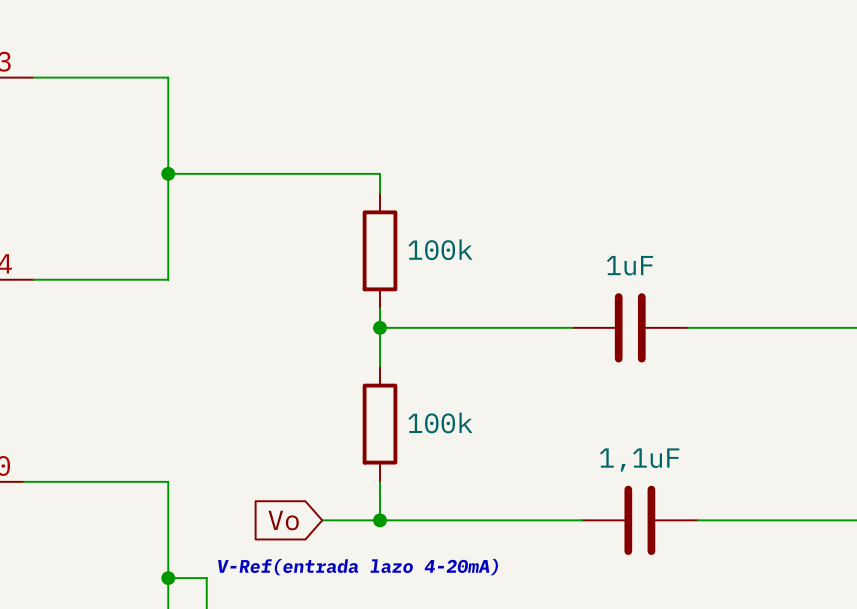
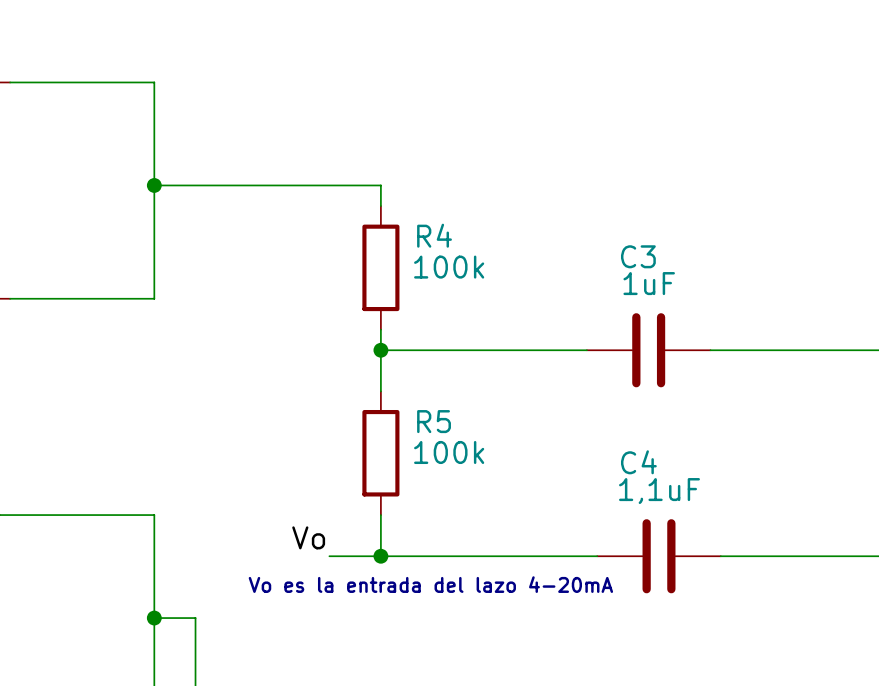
R4 name: none -> R4 (434, 235)
C3 name: none -> C3 (638, 256)
R5 name: none -> R5 (434, 421)
C4 name: none -> C4 (638, 462)
label: none -> Vo (308, 537)
global label: Vo (283, 520) -> none
wire: (322, 520) (331, 520) -> none
text: V-Ref(entrada lazo 4-20mA) (358, 567) -> Vo es la entrada del lazo 4-20mA (430, 584)

